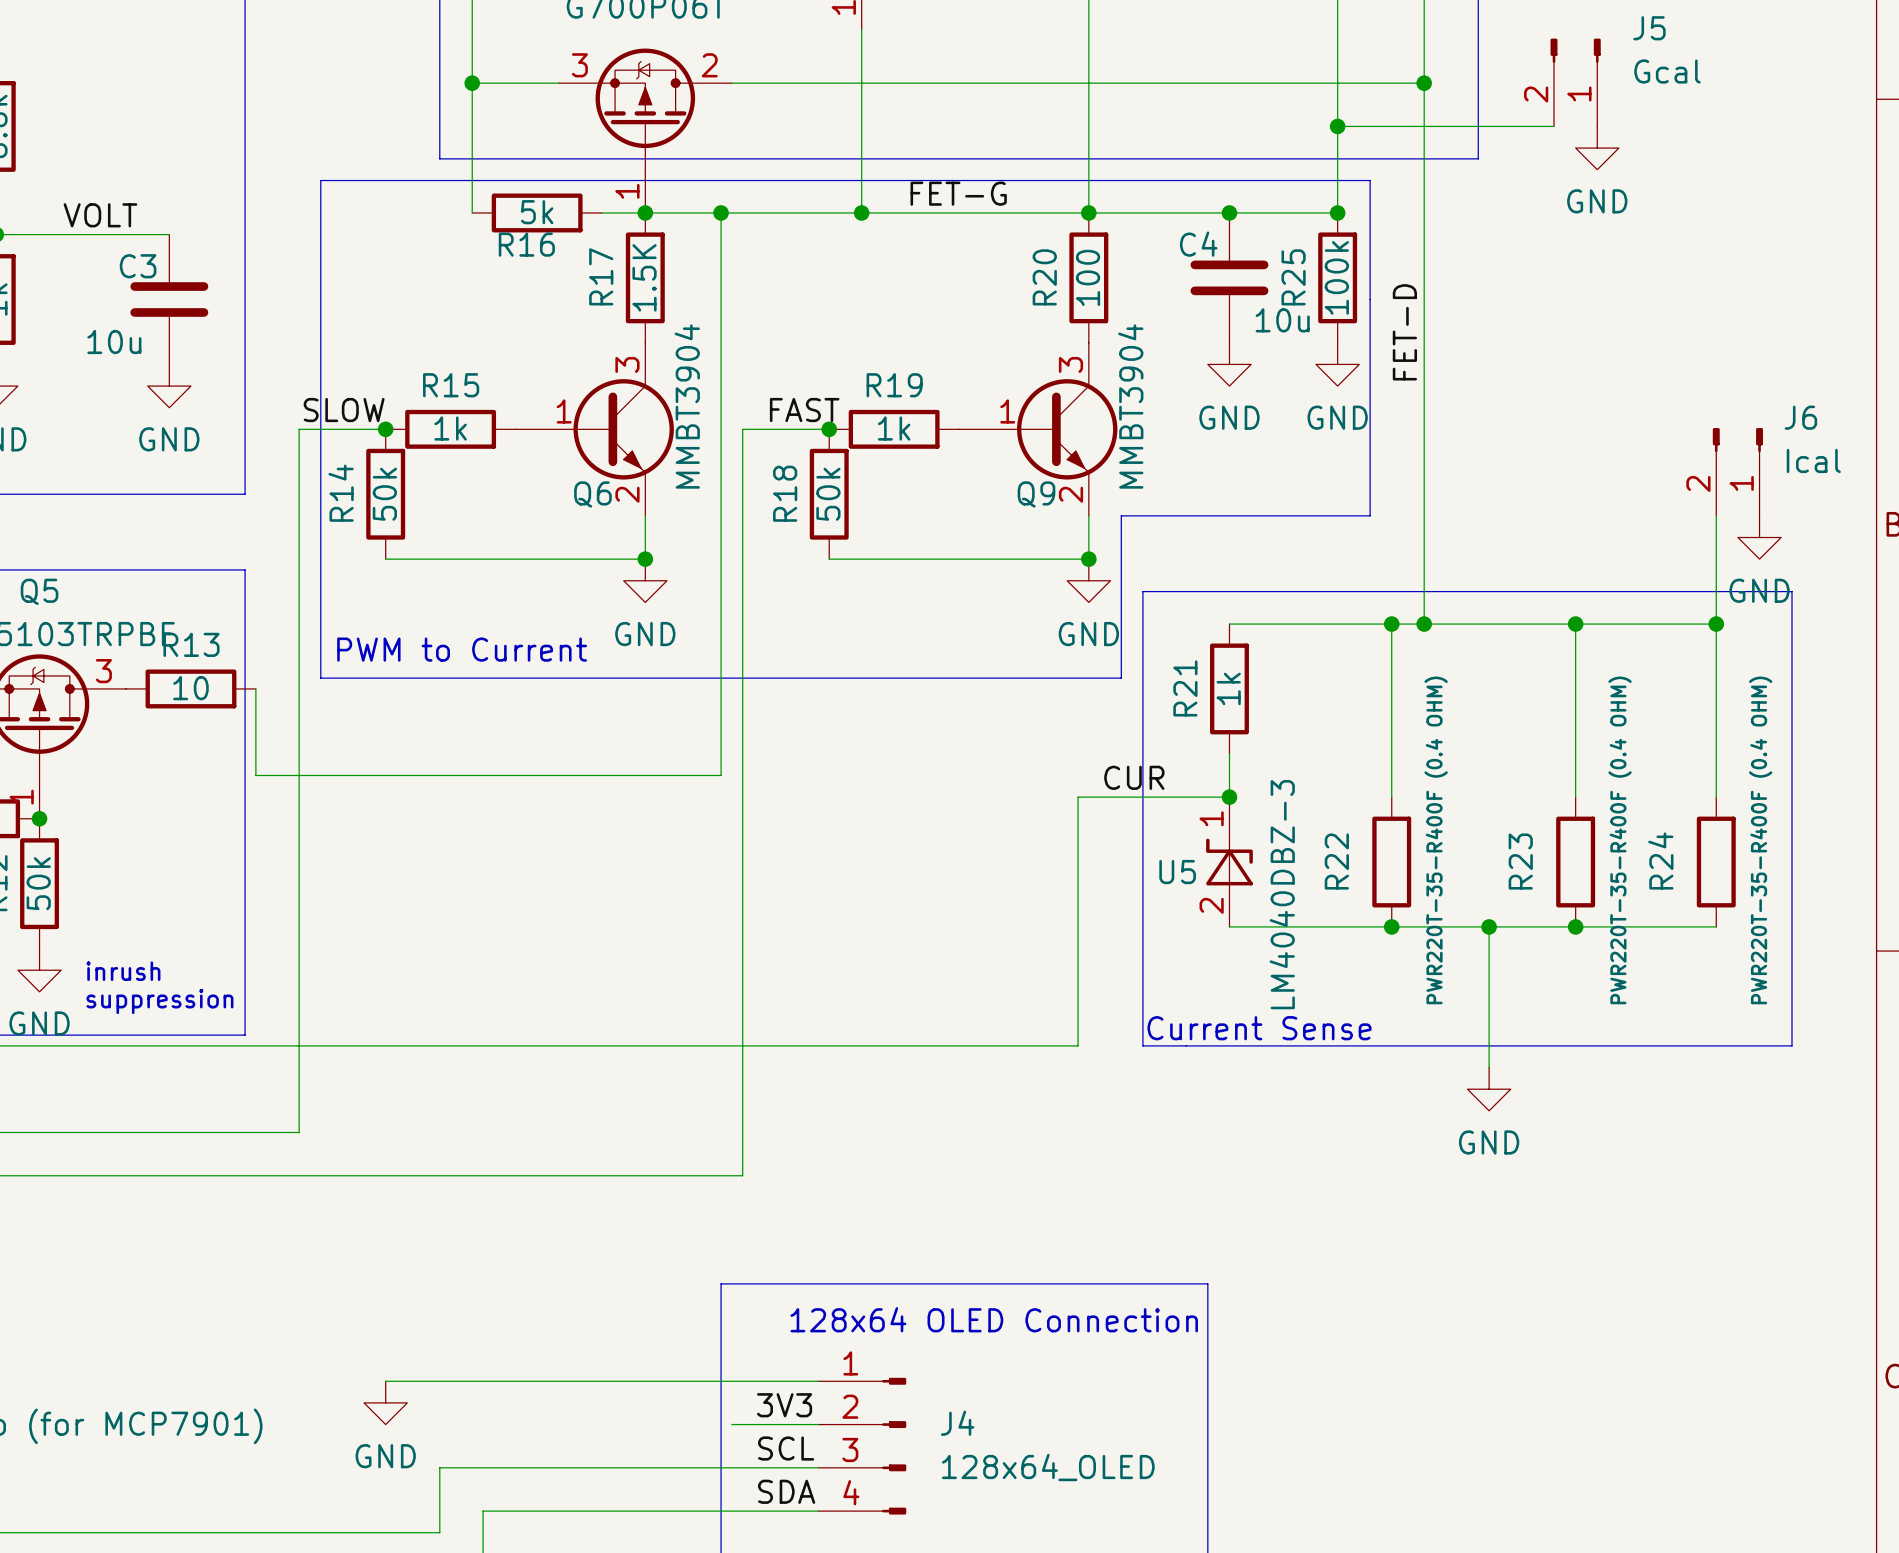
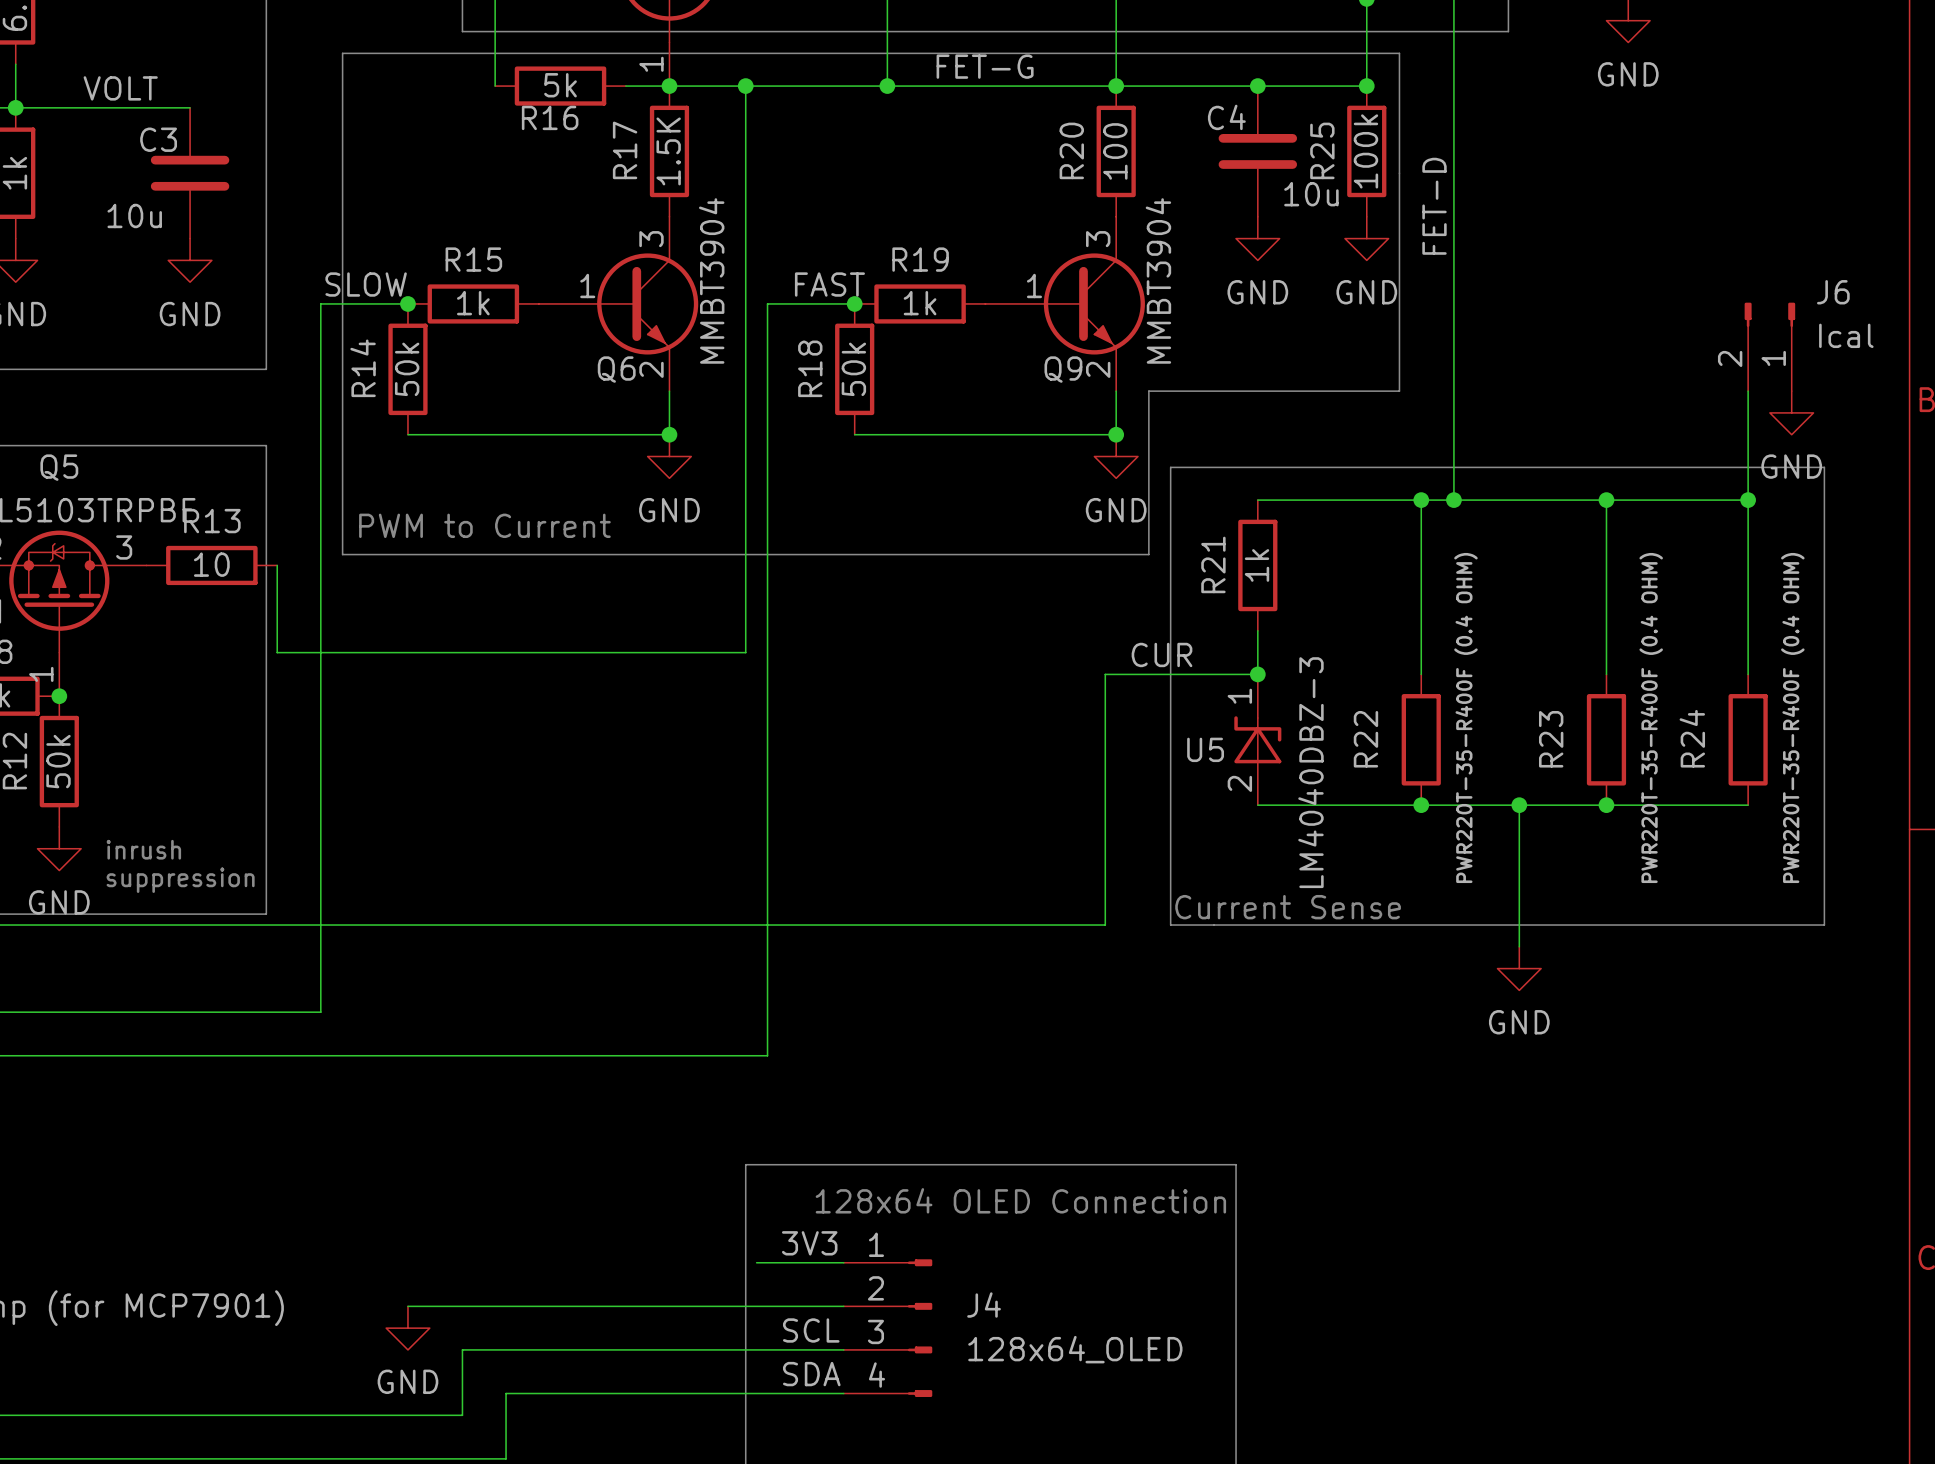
wire: (385, 1381) (731, 1381) -> (407, 1306) (756, 1306)
power symbol position: GND (385, 1402) -> GND (407, 1328)
label position: 3V3 (784, 1405) -> 3V3 (809, 1243)

